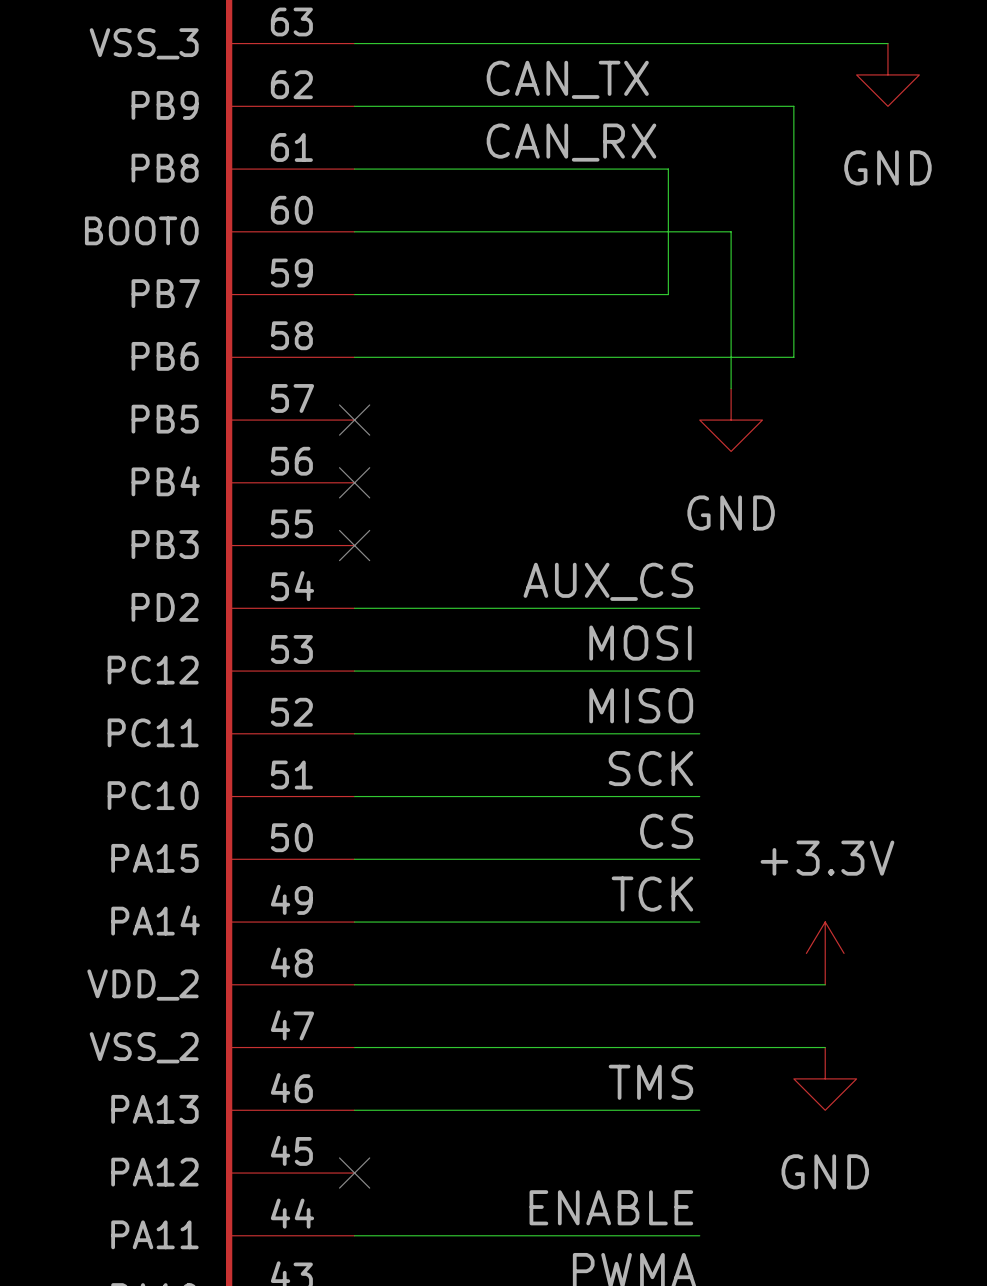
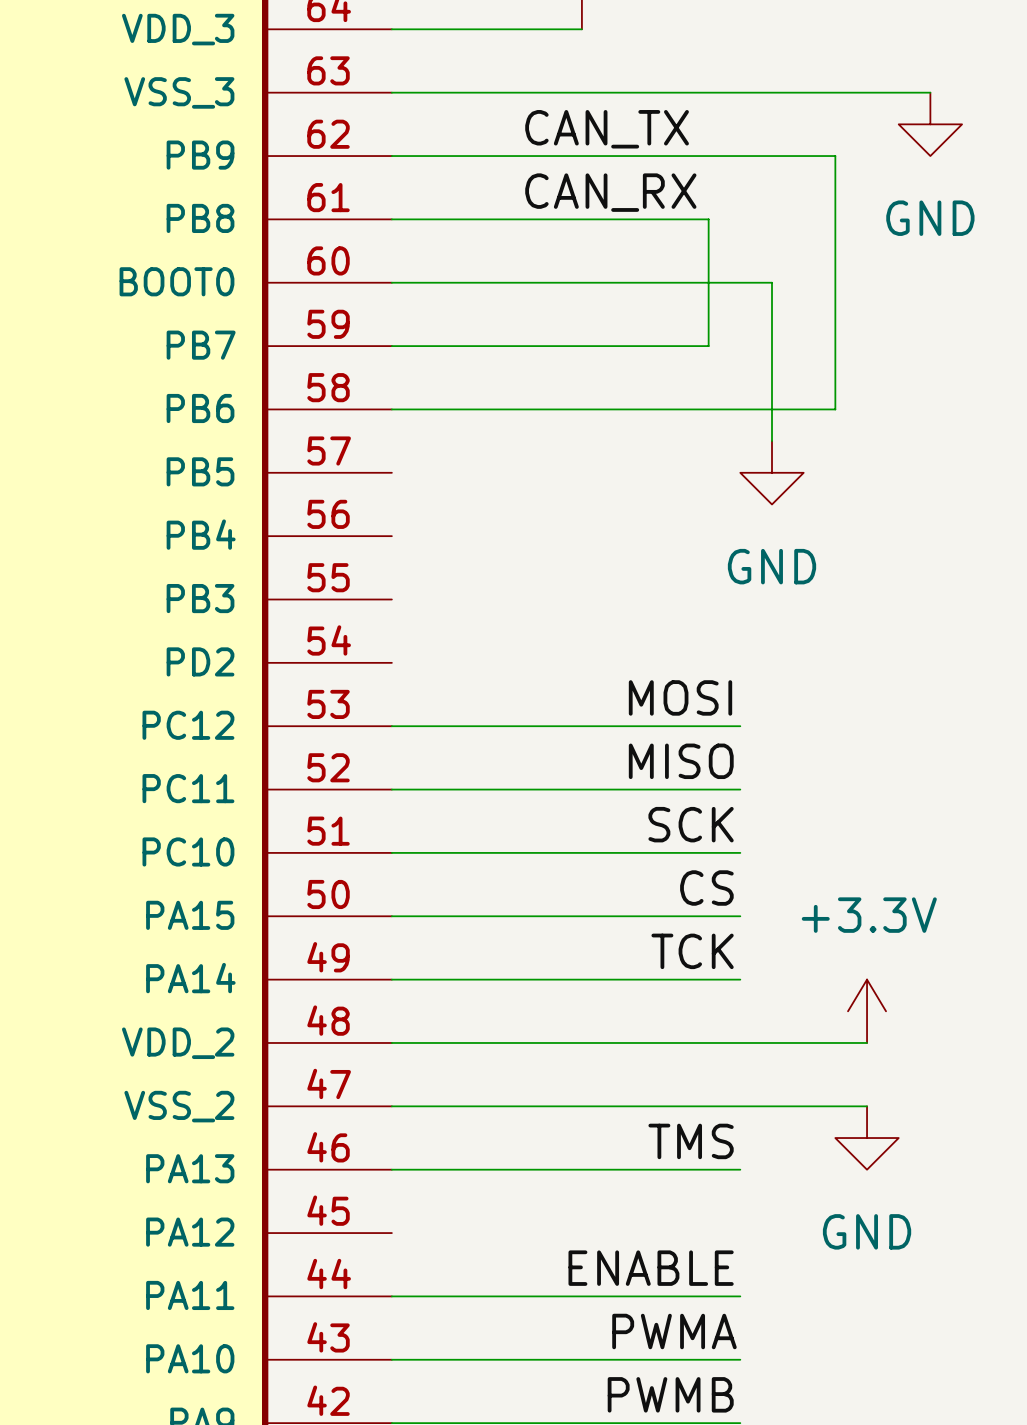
no-connect mark: (354, 420) -> none
no-connect mark: (354, 482) -> none
no-connect mark: (354, 545) -> none
label: AUX_CS (608, 581) -> none
wire: (354, 608) (699, 608) -> none
no-connect mark: (354, 1173) -> none

